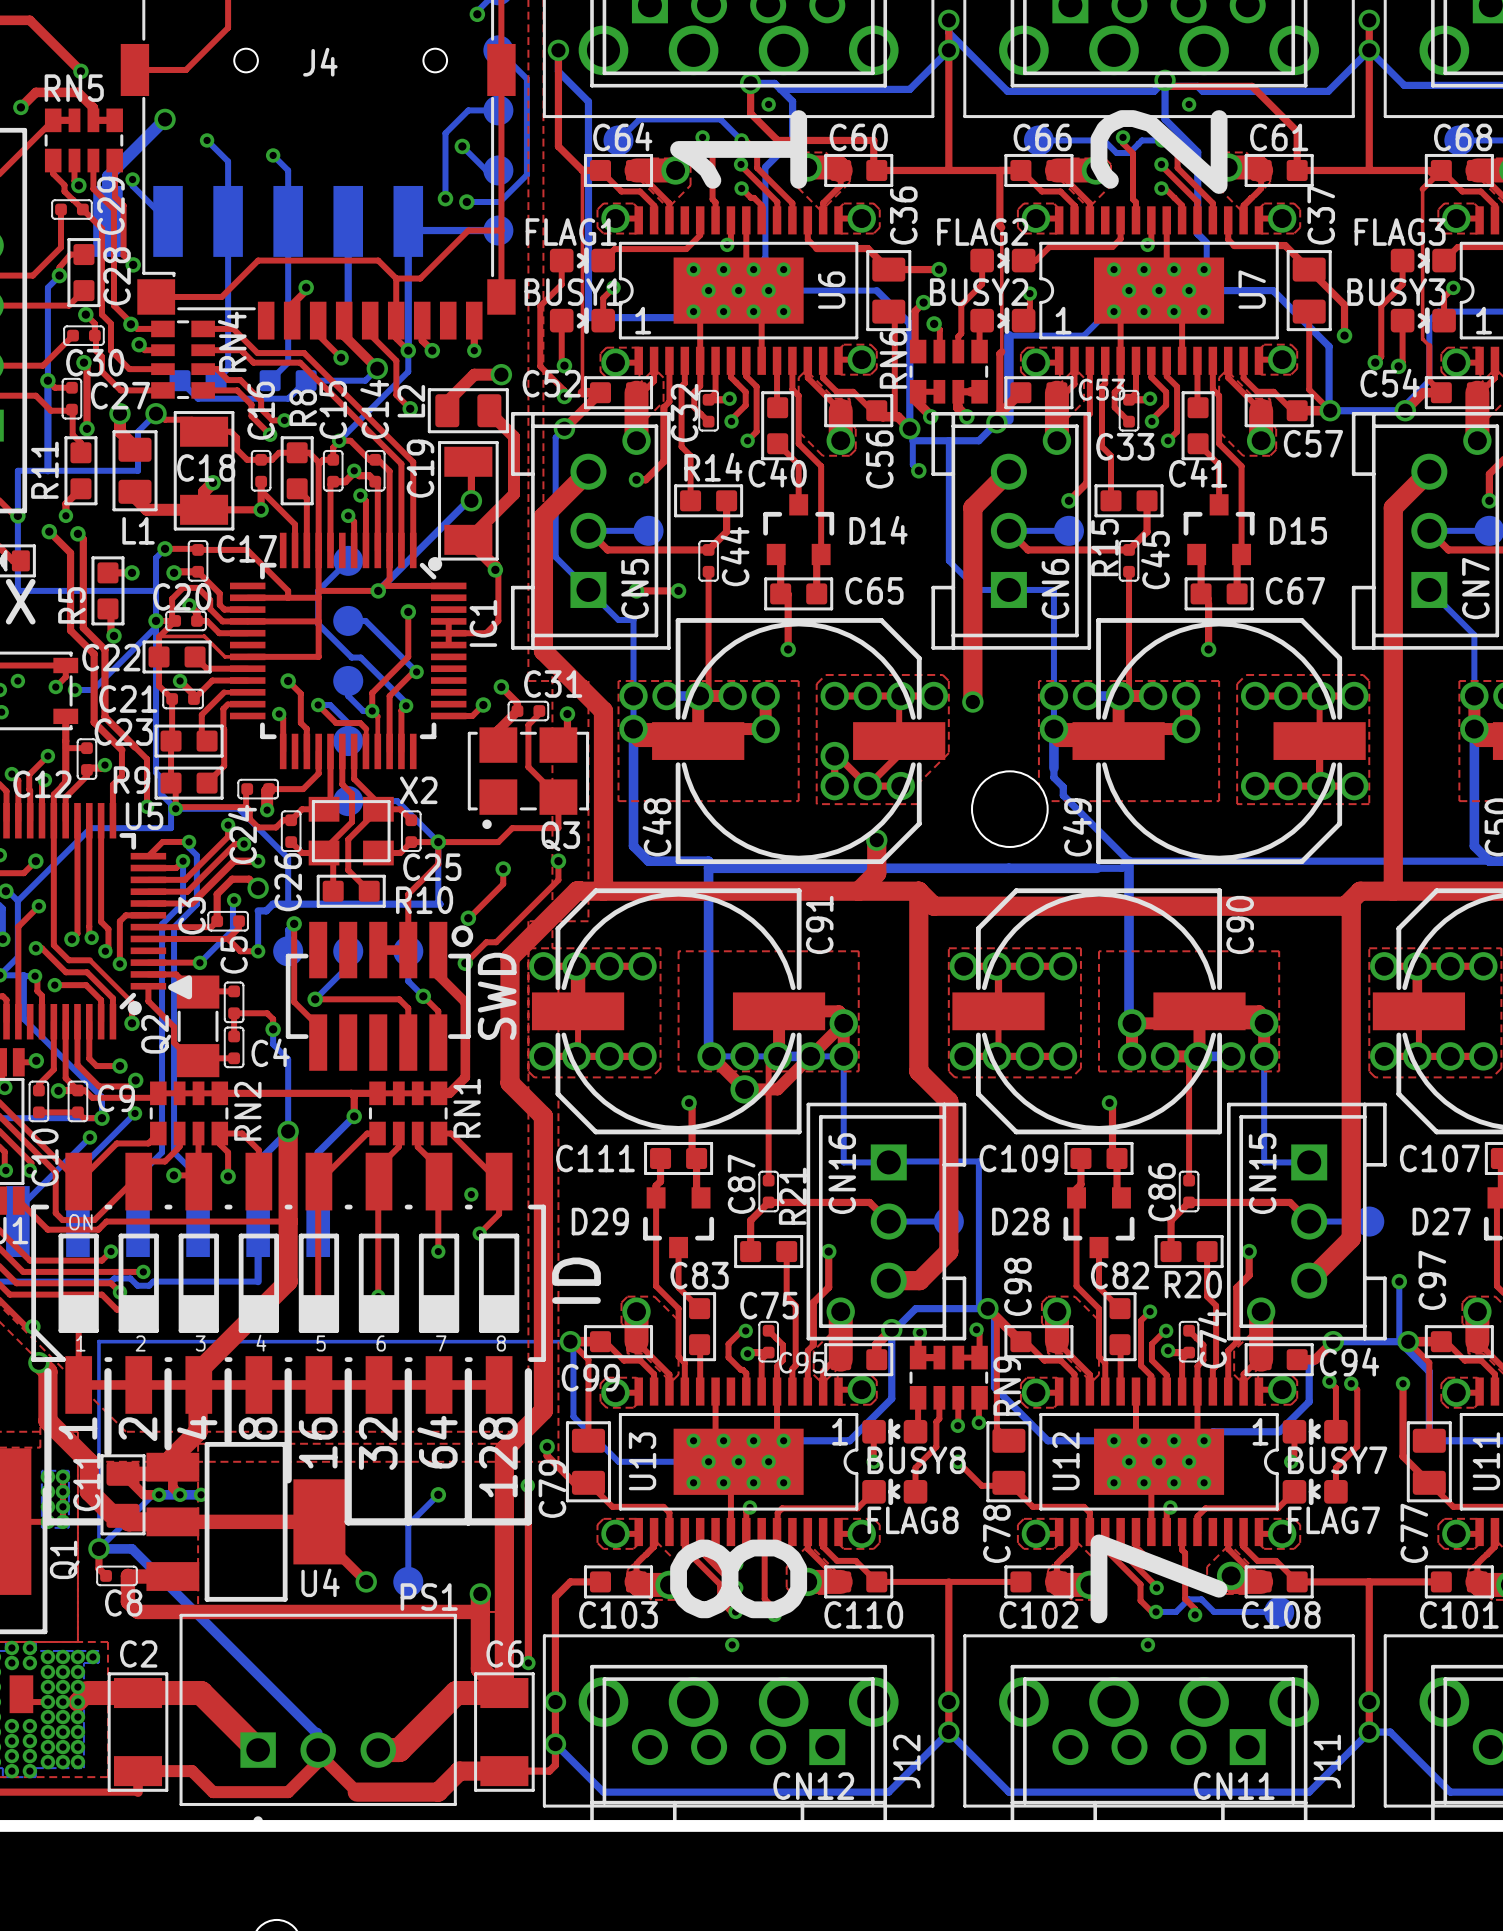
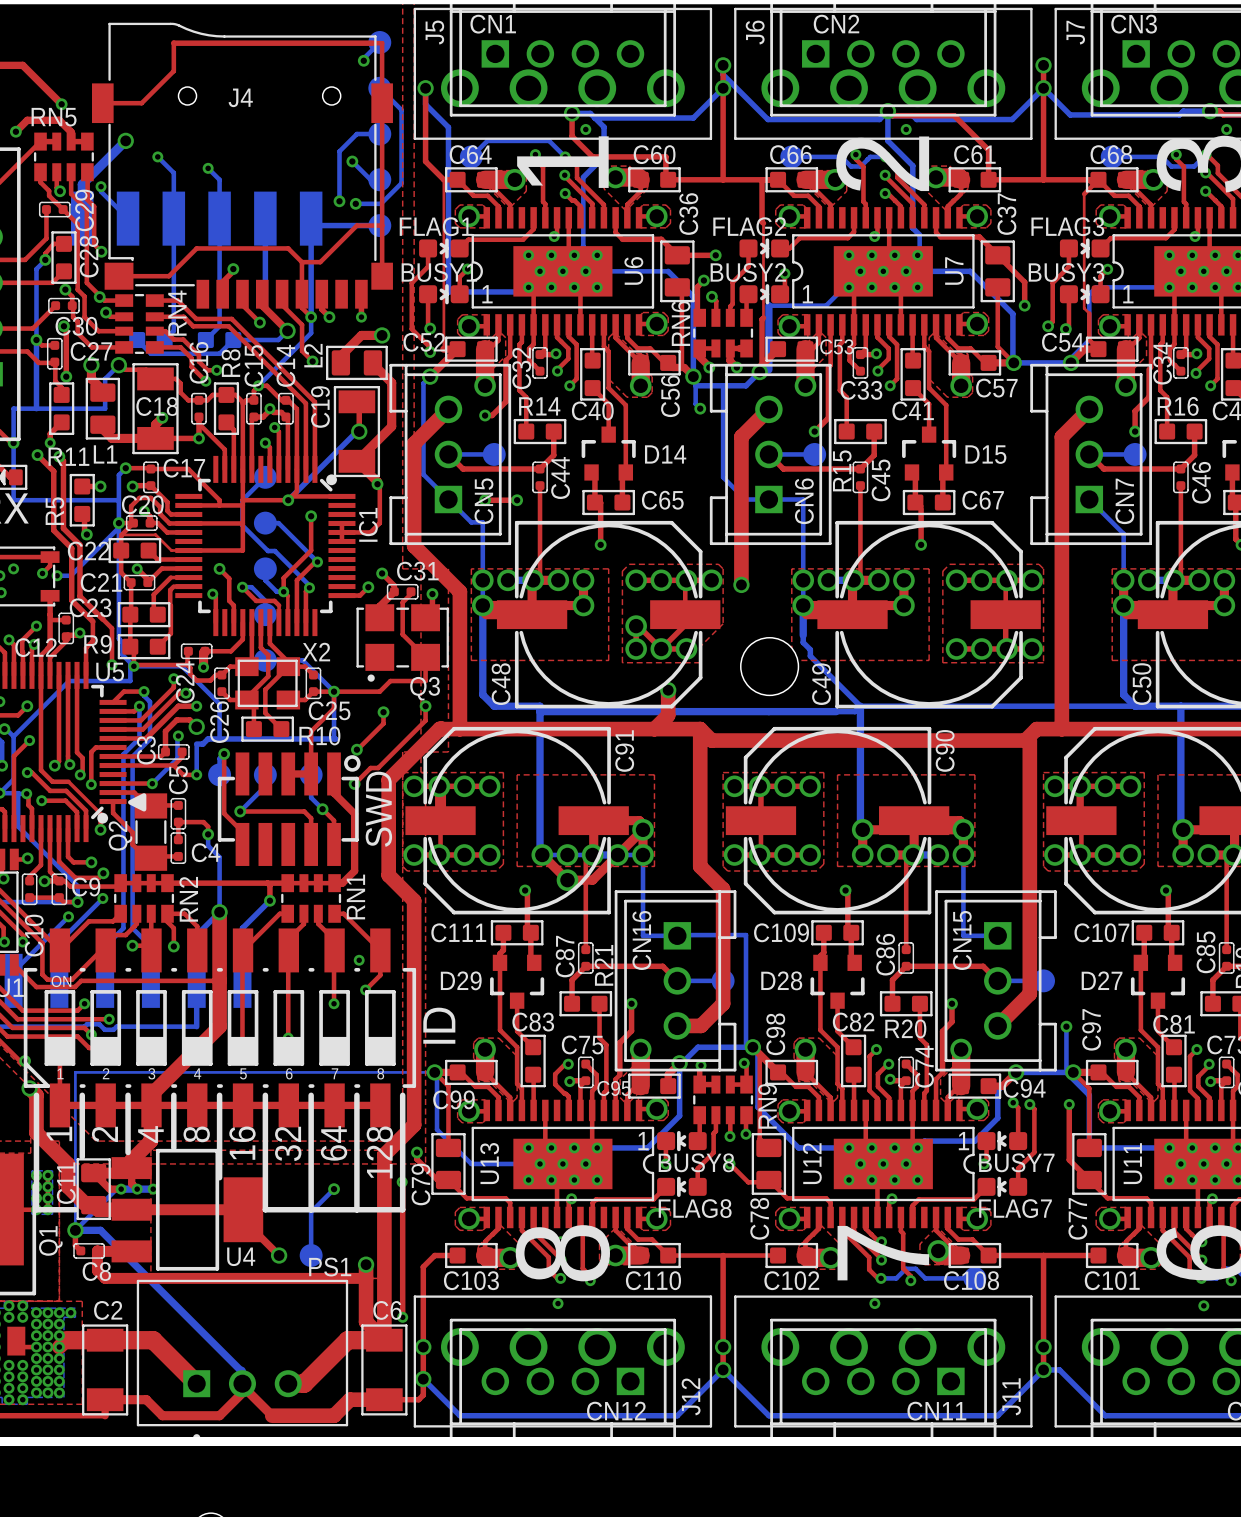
R11 name rotation: 0° (44, 470) -> 90° clockwise (68, 456)
R11 name position: R11 (44, 470) -> R11 (68, 456)

